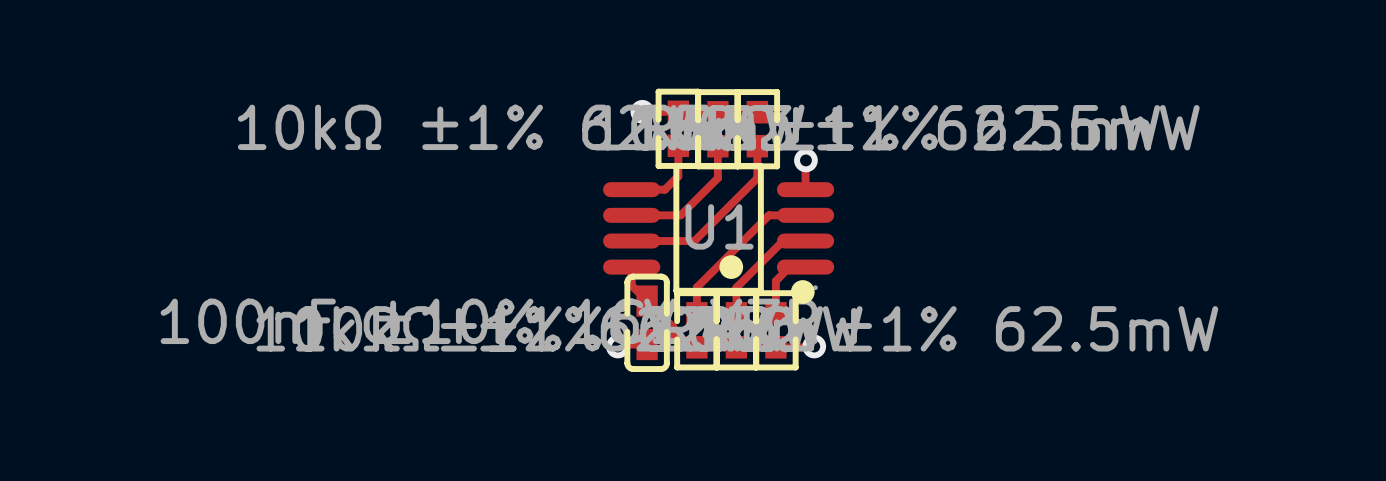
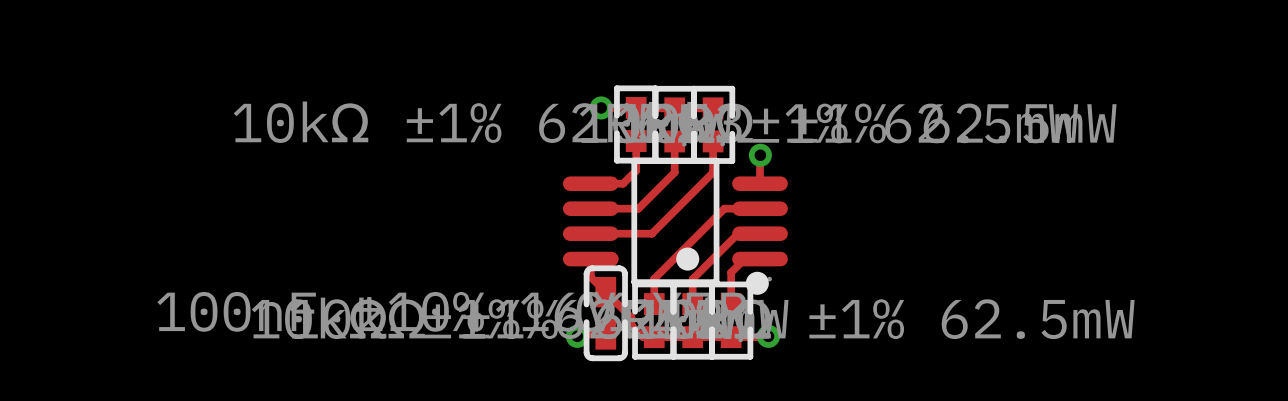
U1 name: U1 (719, 226) -> none

